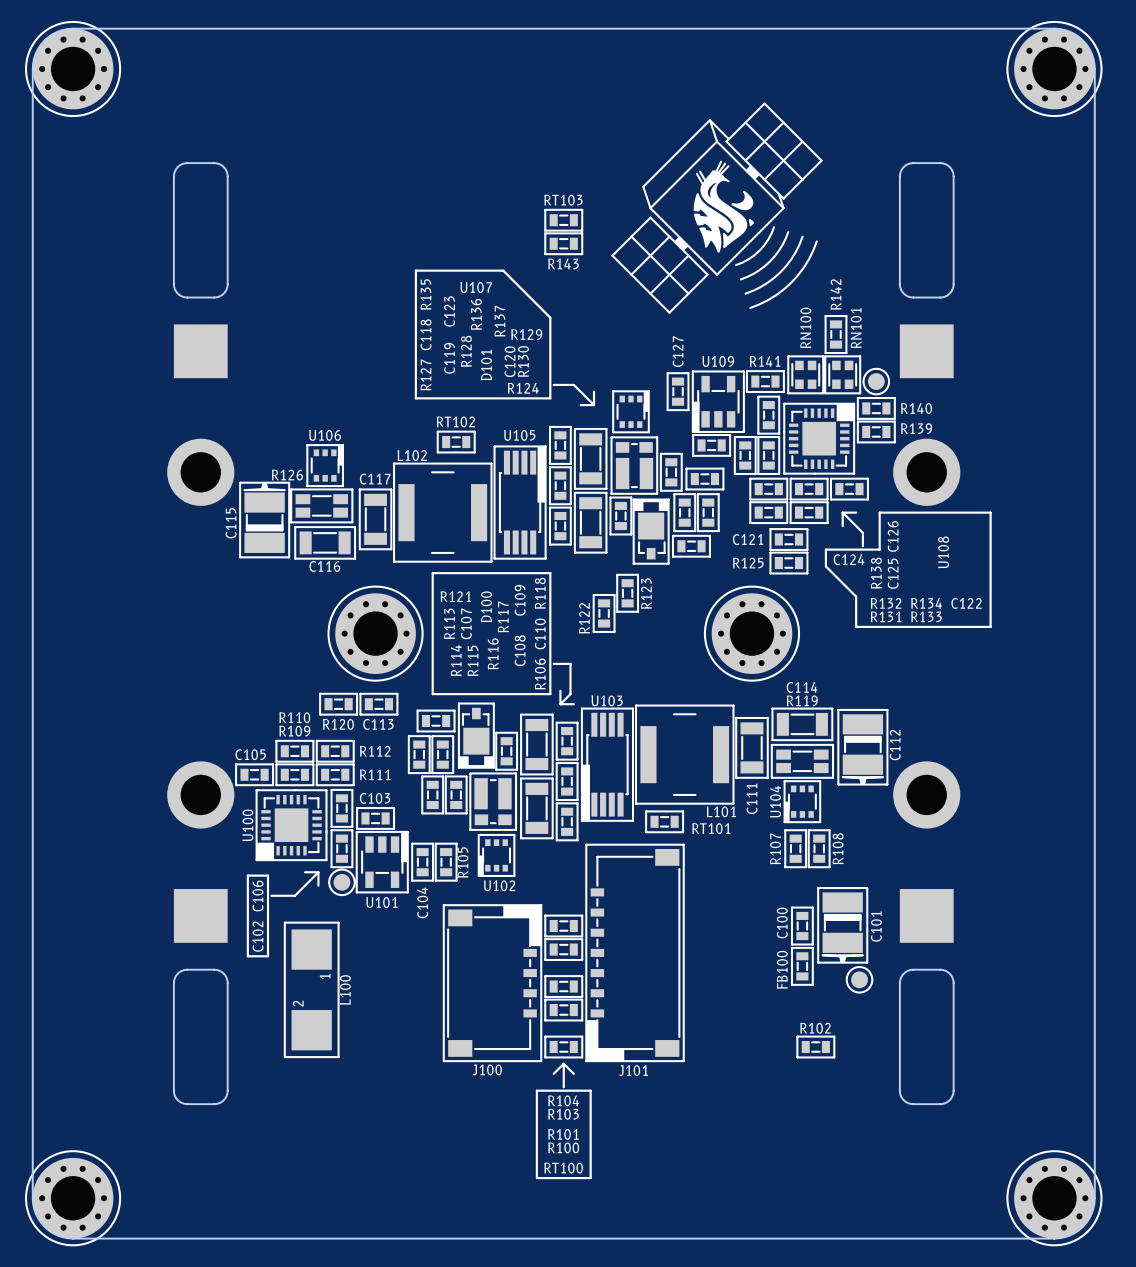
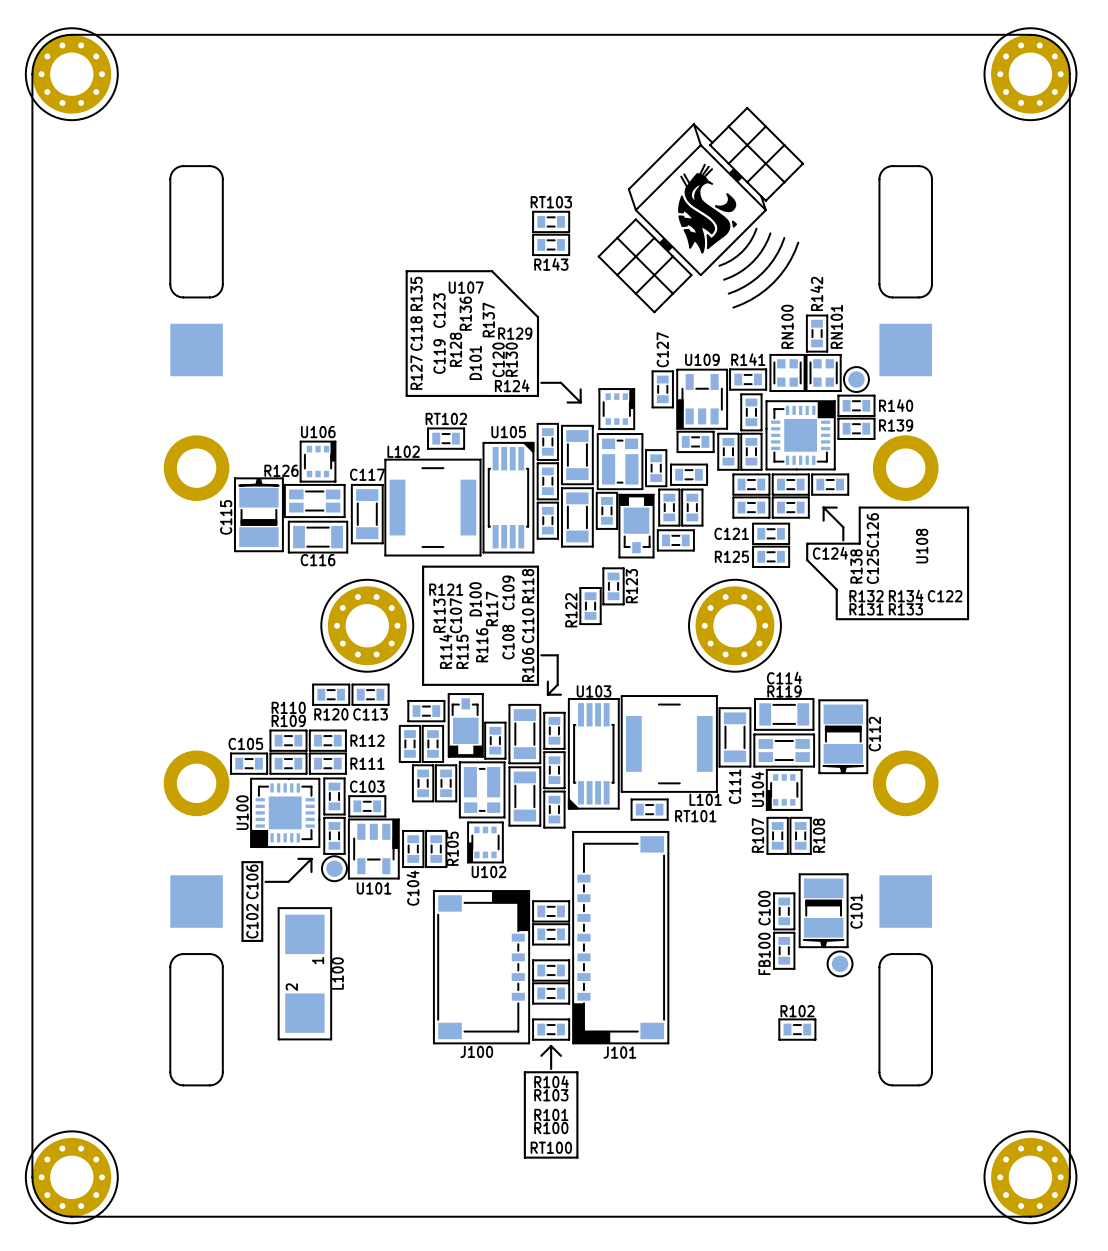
U105 footprint: [493, 445, 547, 560] -> [482, 441, 535, 554]
U103 footprint: [580, 707, 635, 822] -> [567, 697, 620, 810]

